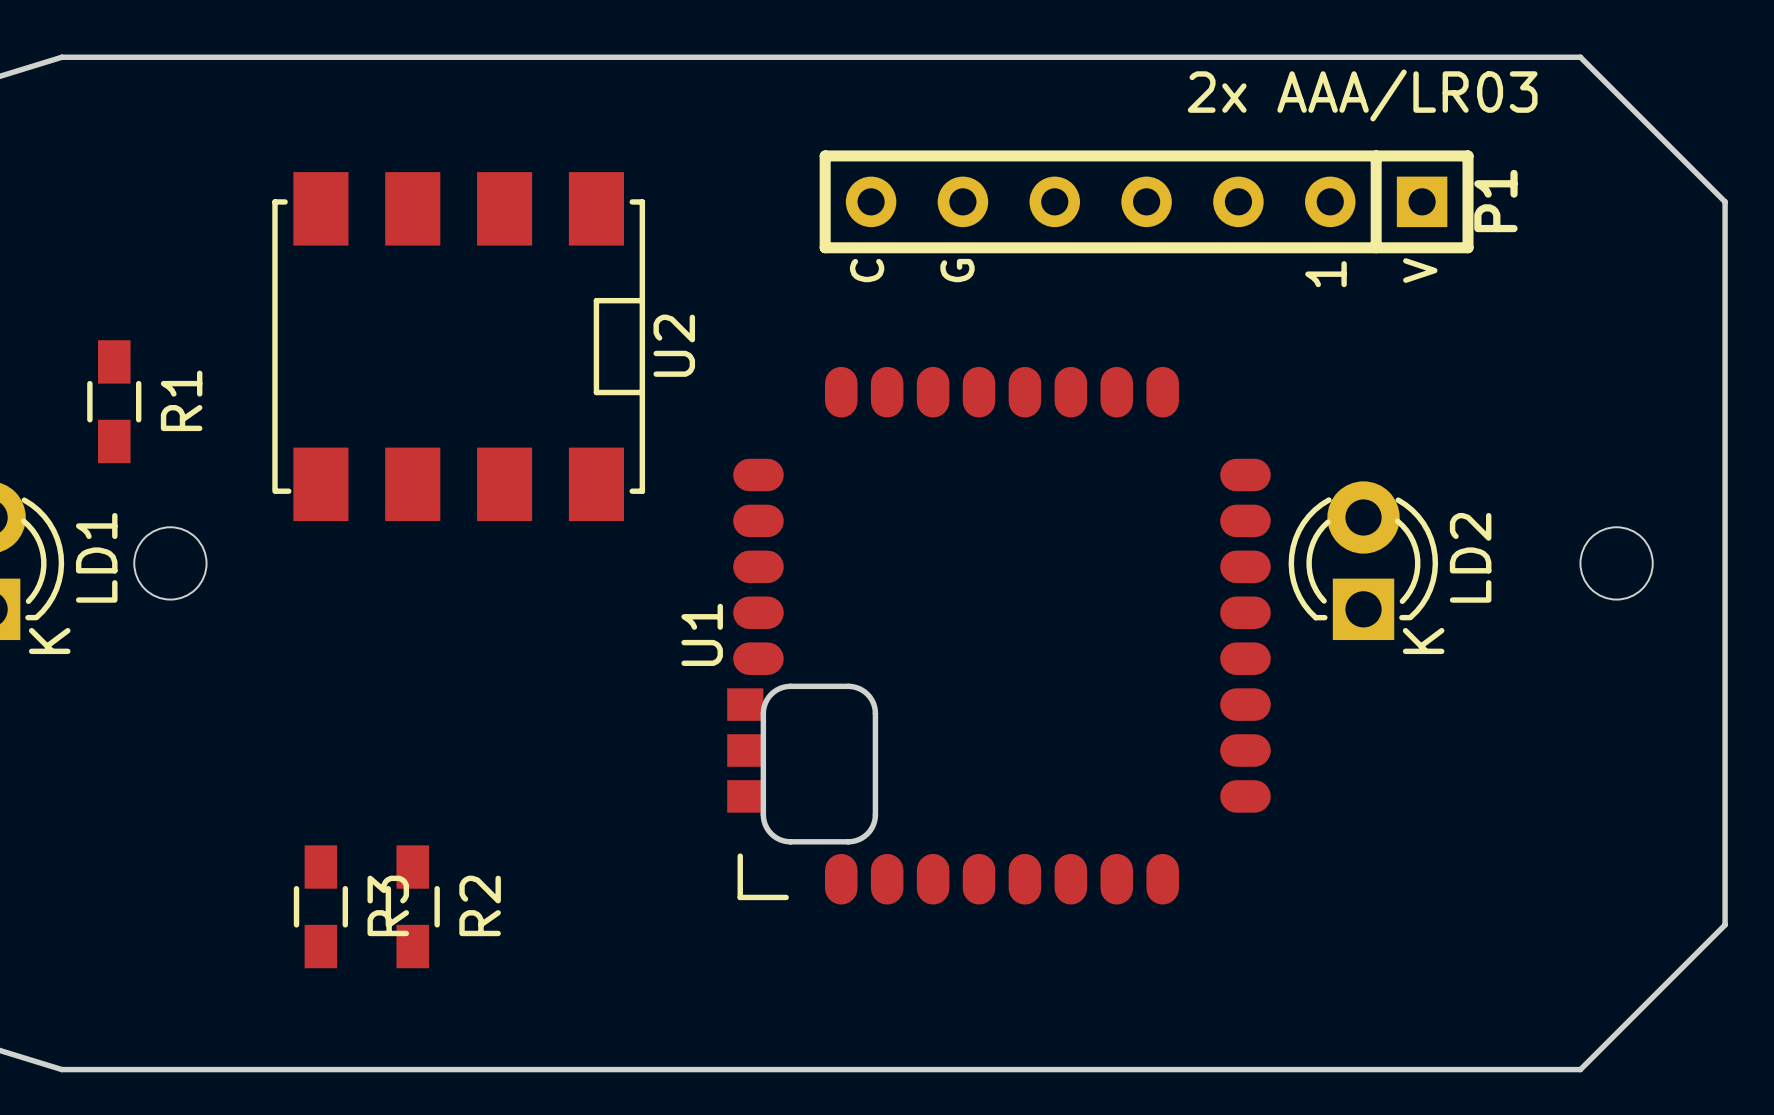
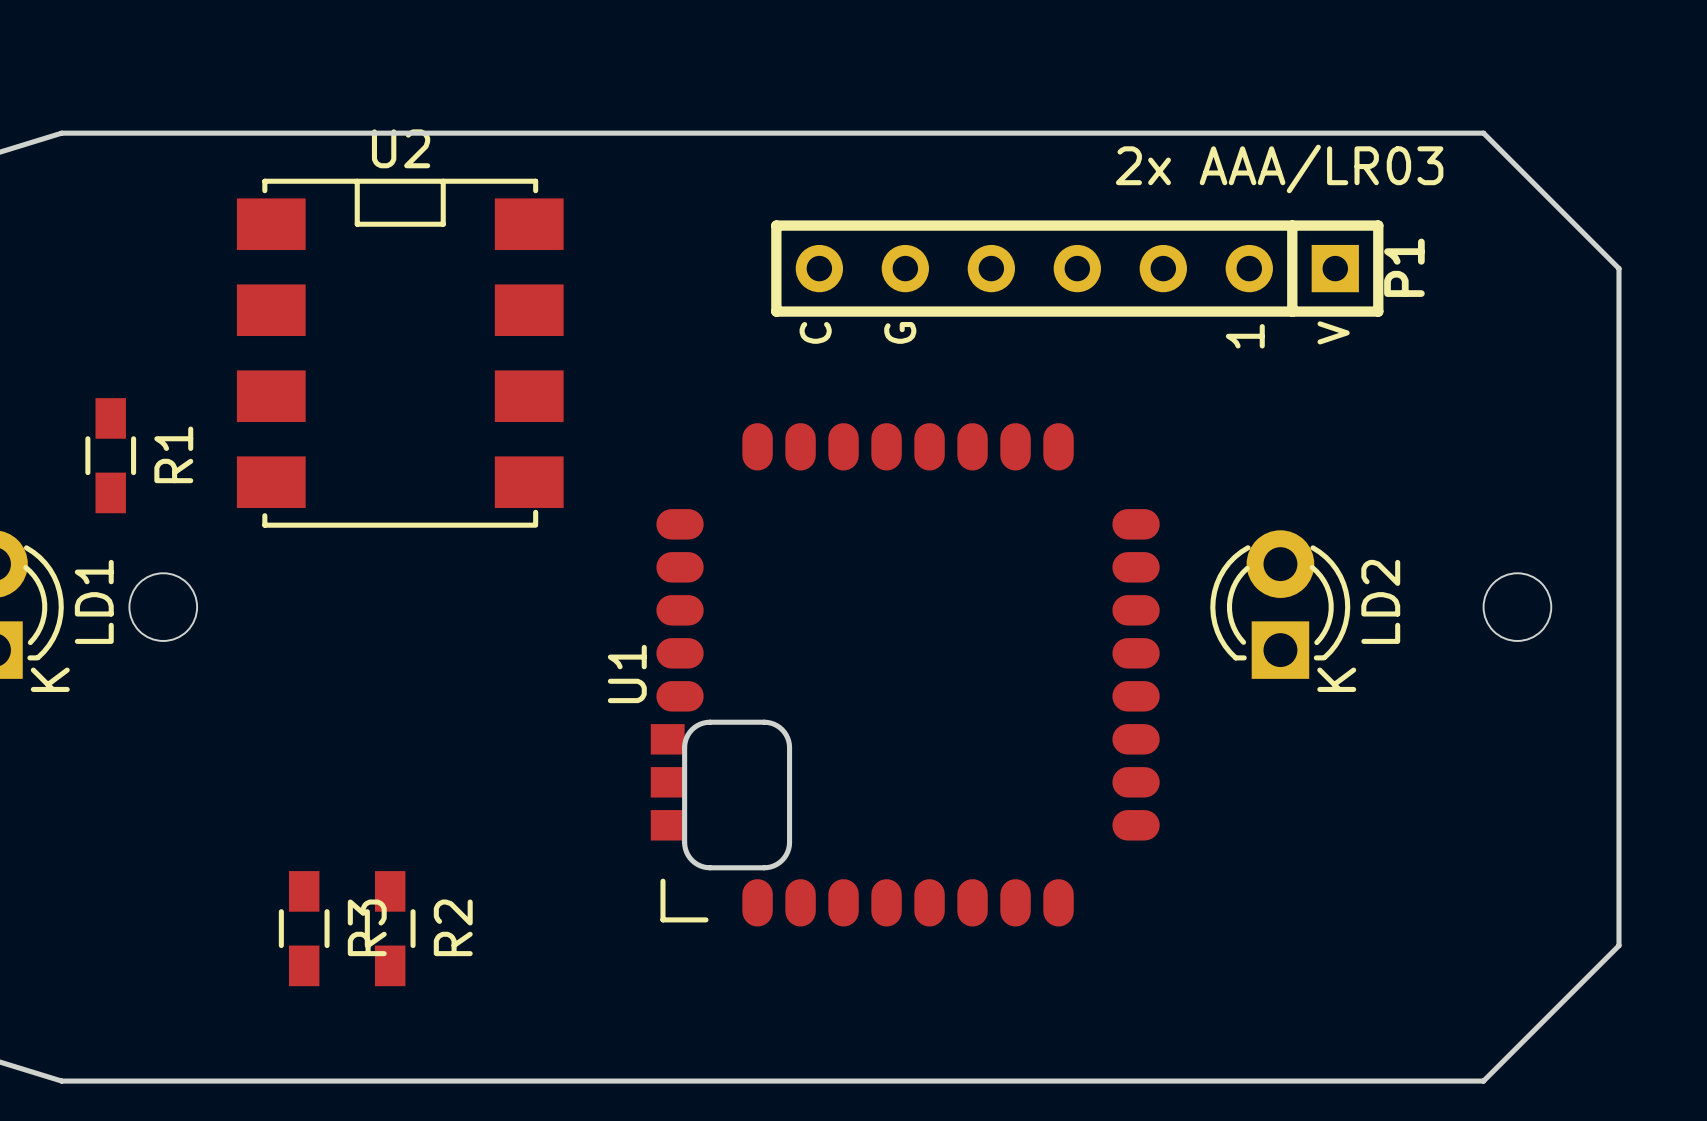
U2 rotation: 0° (458, 346) -> 90° counterclockwise (400, 353)
U1 position: (998, 635) -> (905, 674)

